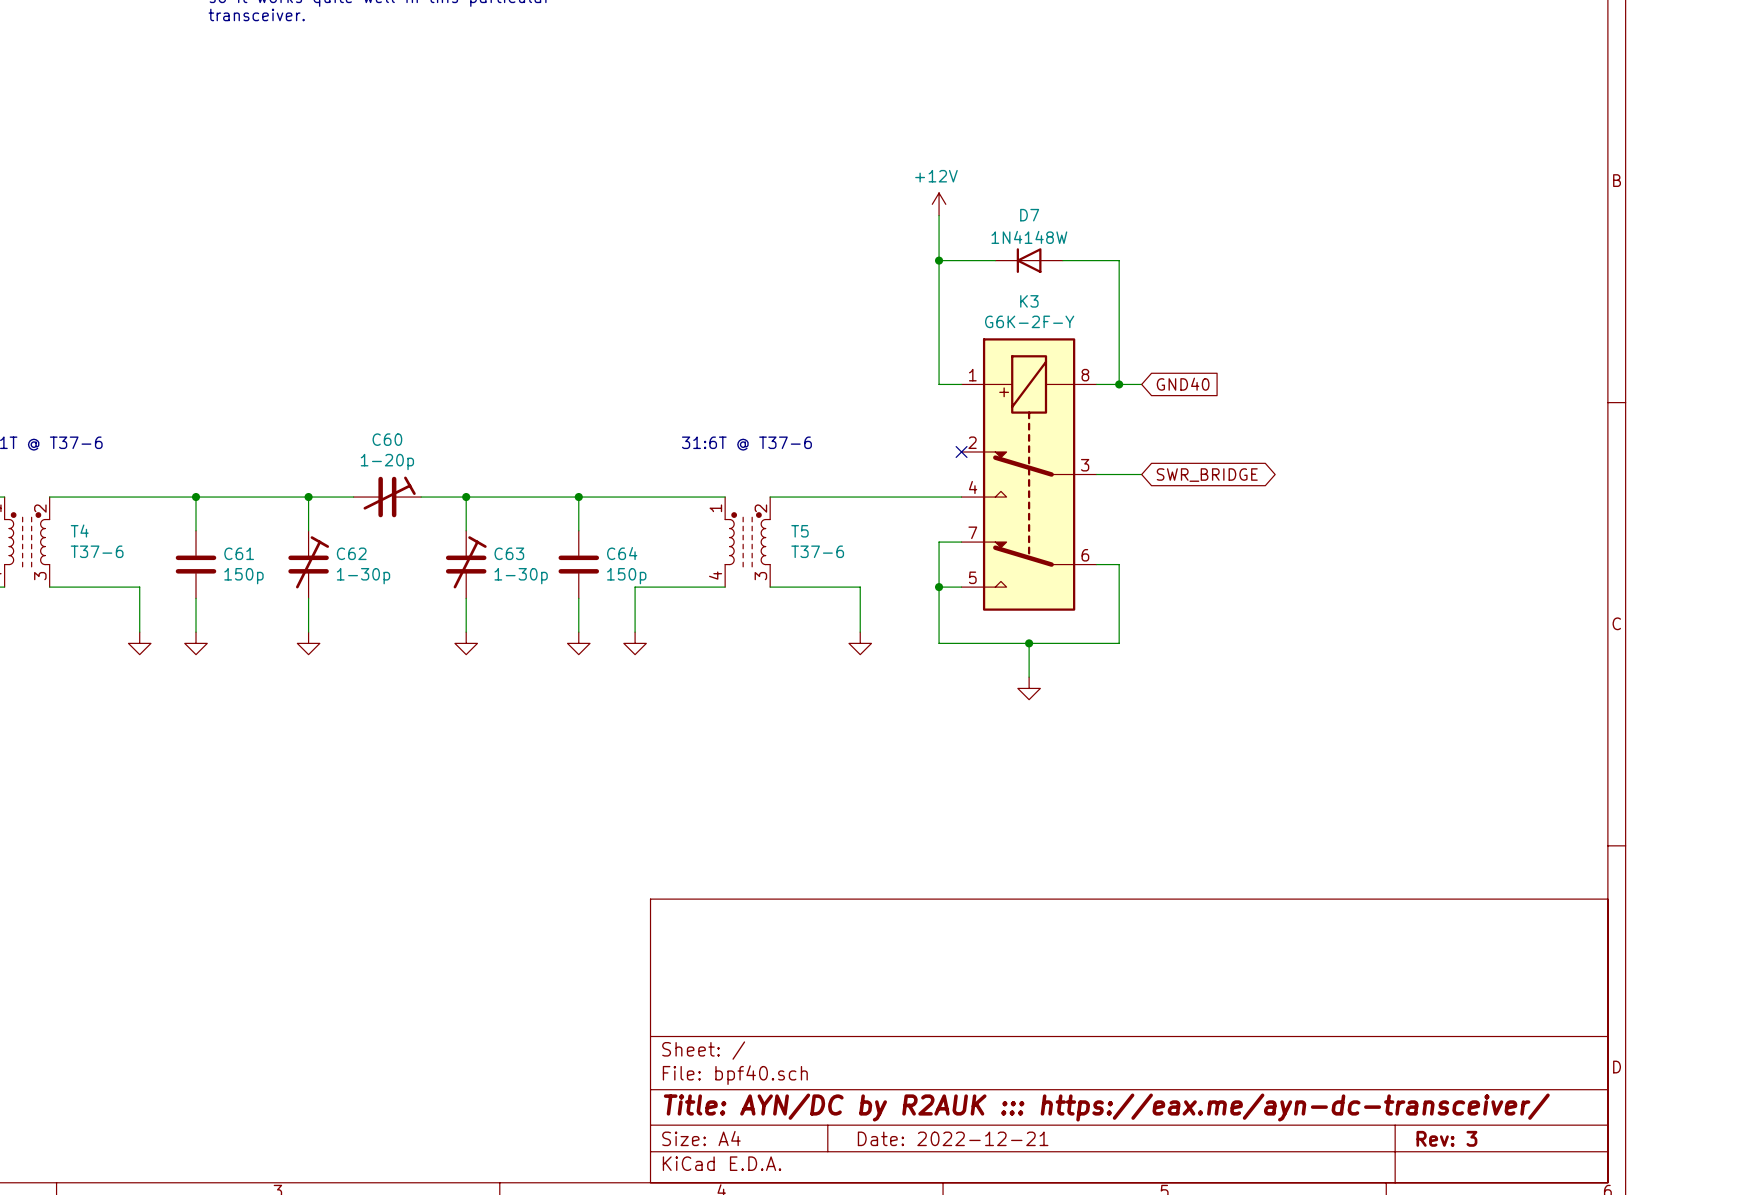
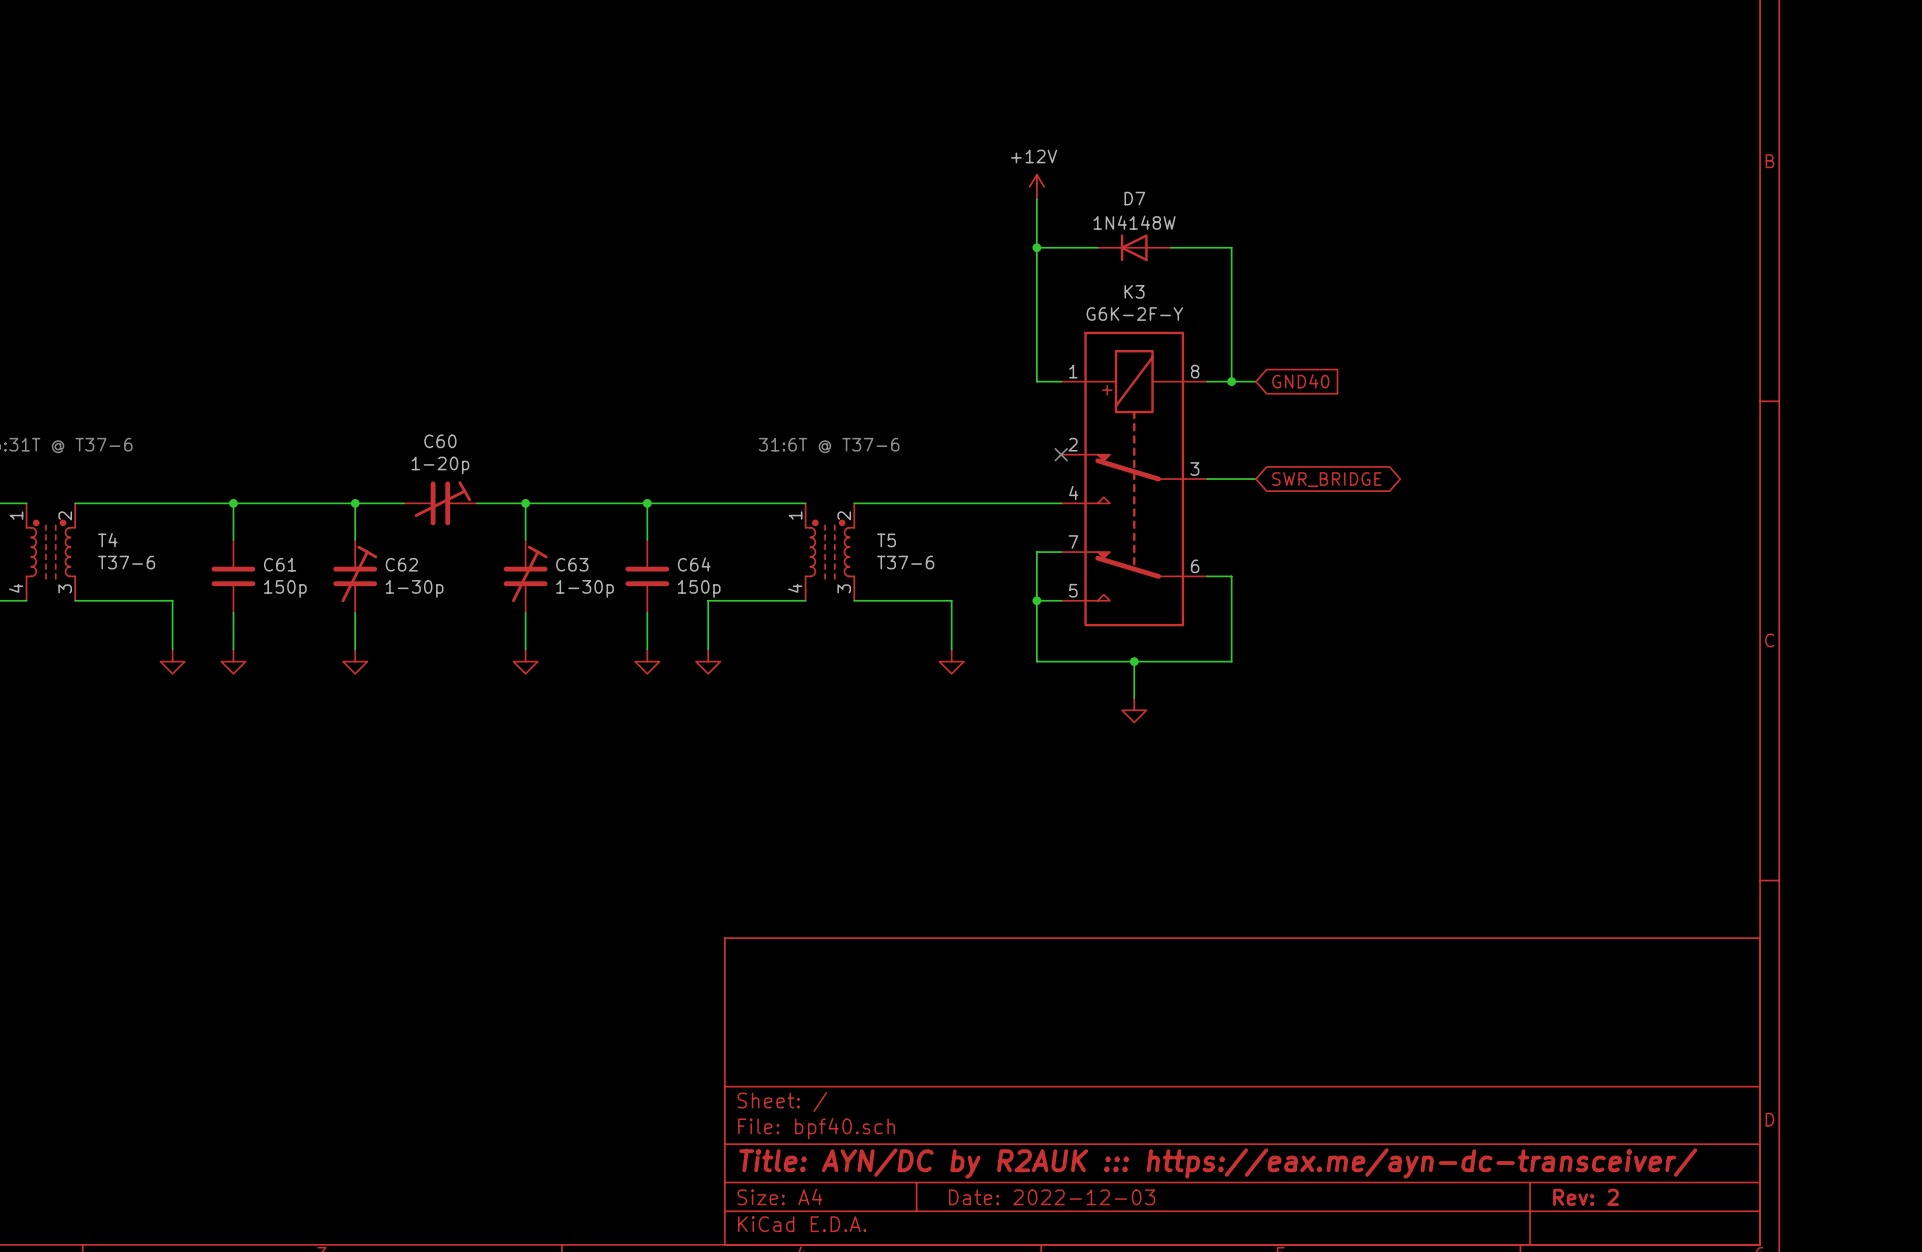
title block: Date: 2022-12-21 (953, 1138) -> Date: 2022-12-03 (1052, 1197)
title block: Rev: 3 (1446, 1138) -> Rev: 2 (1586, 1197)

